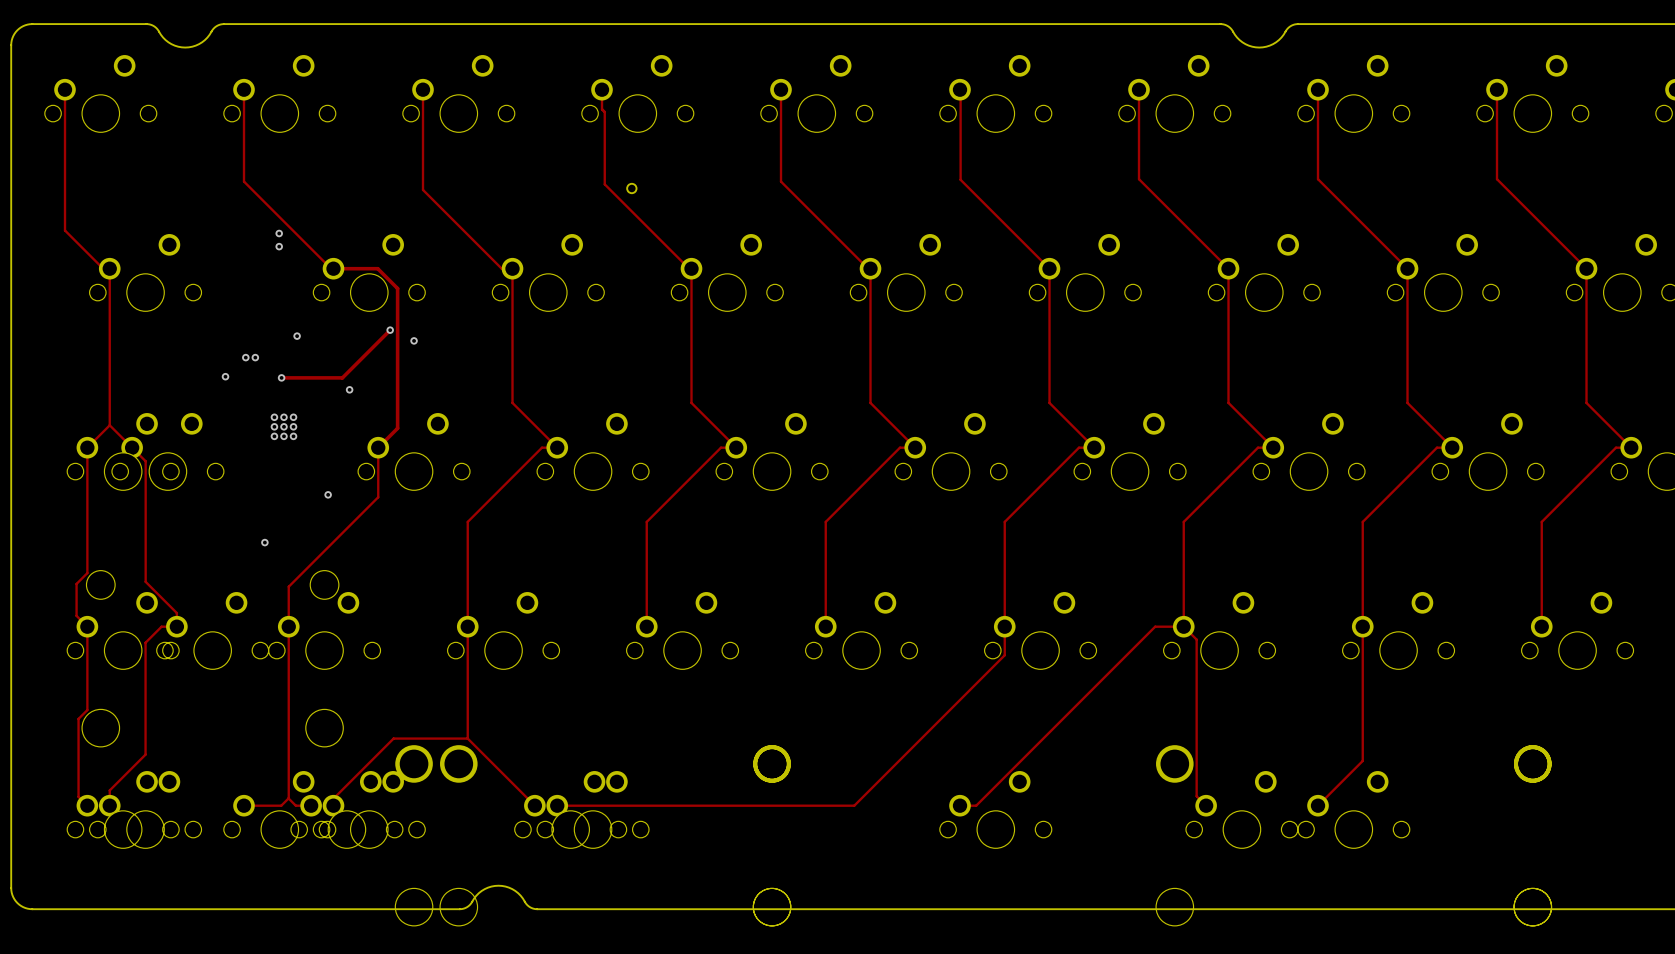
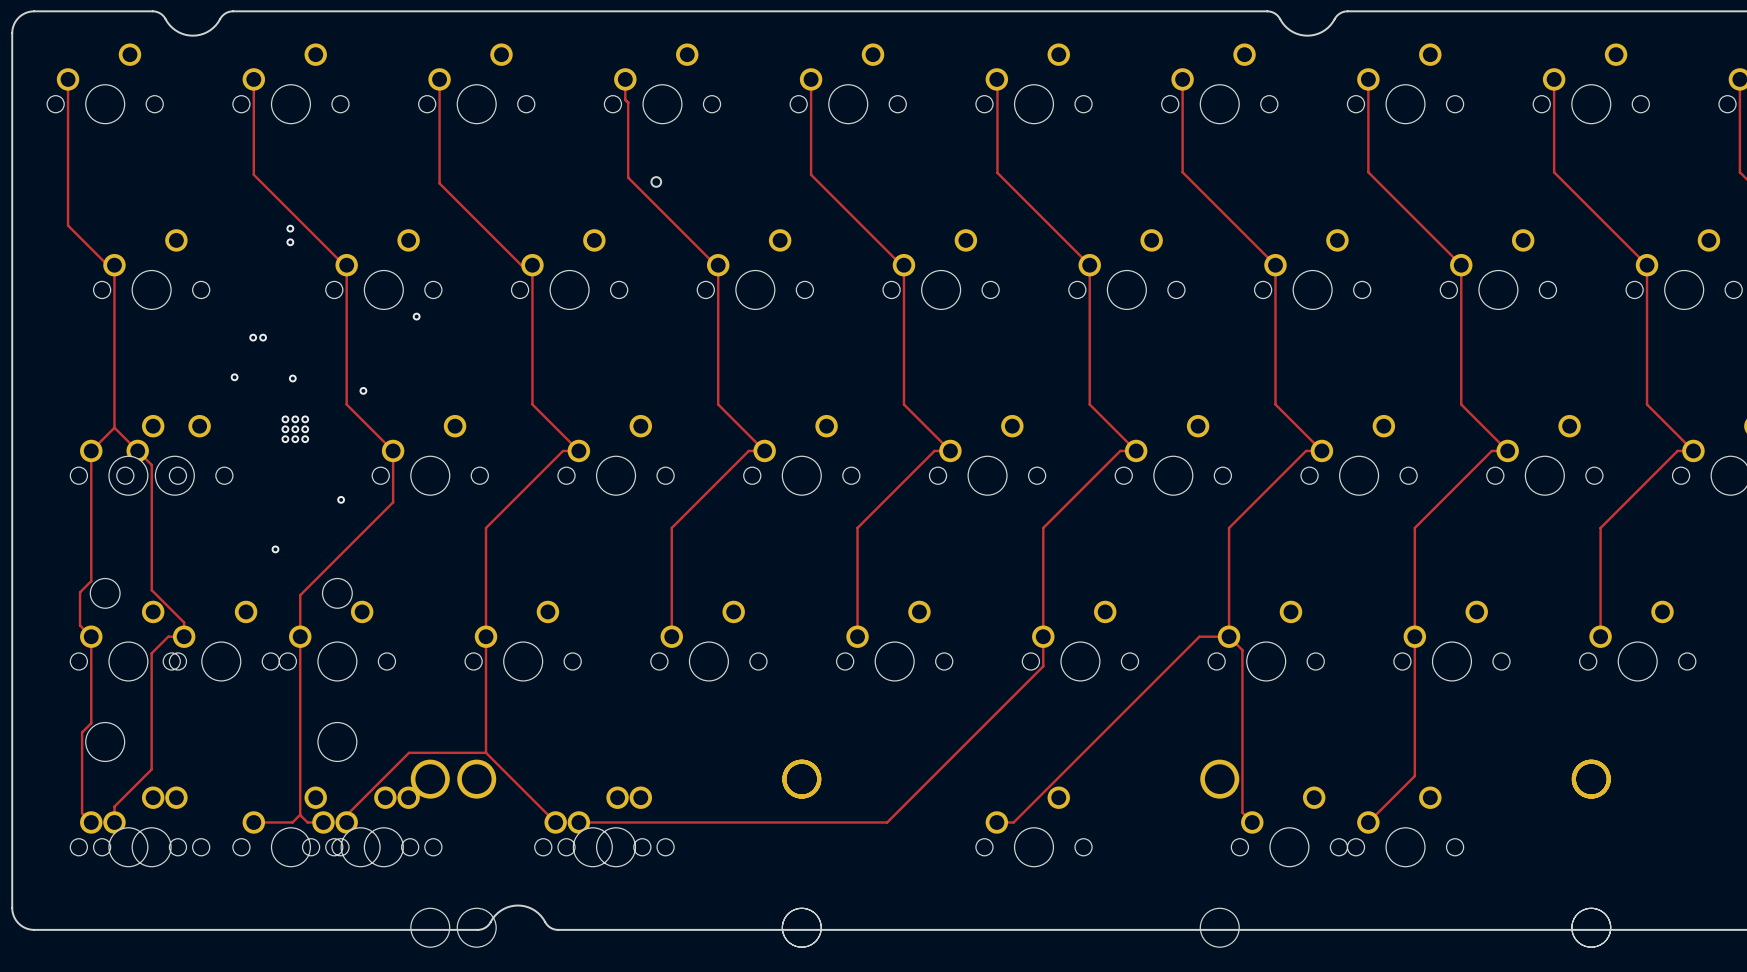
track: (333, 268) (377, 268) (397, 288) (397, 428) (378, 447) -> (346, 265) (346, 404) (393, 450)
via: none -> (416, 316)
track: (390, 330) (342, 377) (281, 377) -> none
via: (390, 330) -> none
via: (297, 336) -> none
via: none -> (253, 337)
via: none -> (263, 337)
via: (414, 340) -> none
via: (245, 357) -> none
via: (255, 357) -> none

